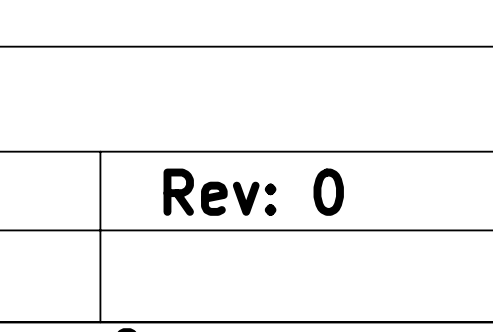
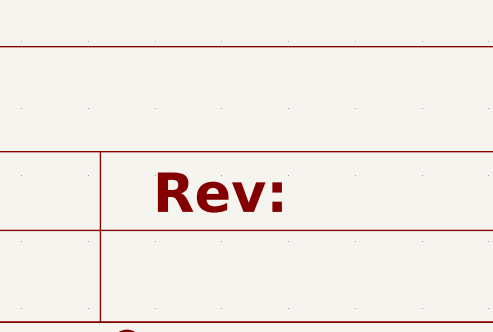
title block: Rev: 0 (253, 192) -> Rev: (219, 192)

